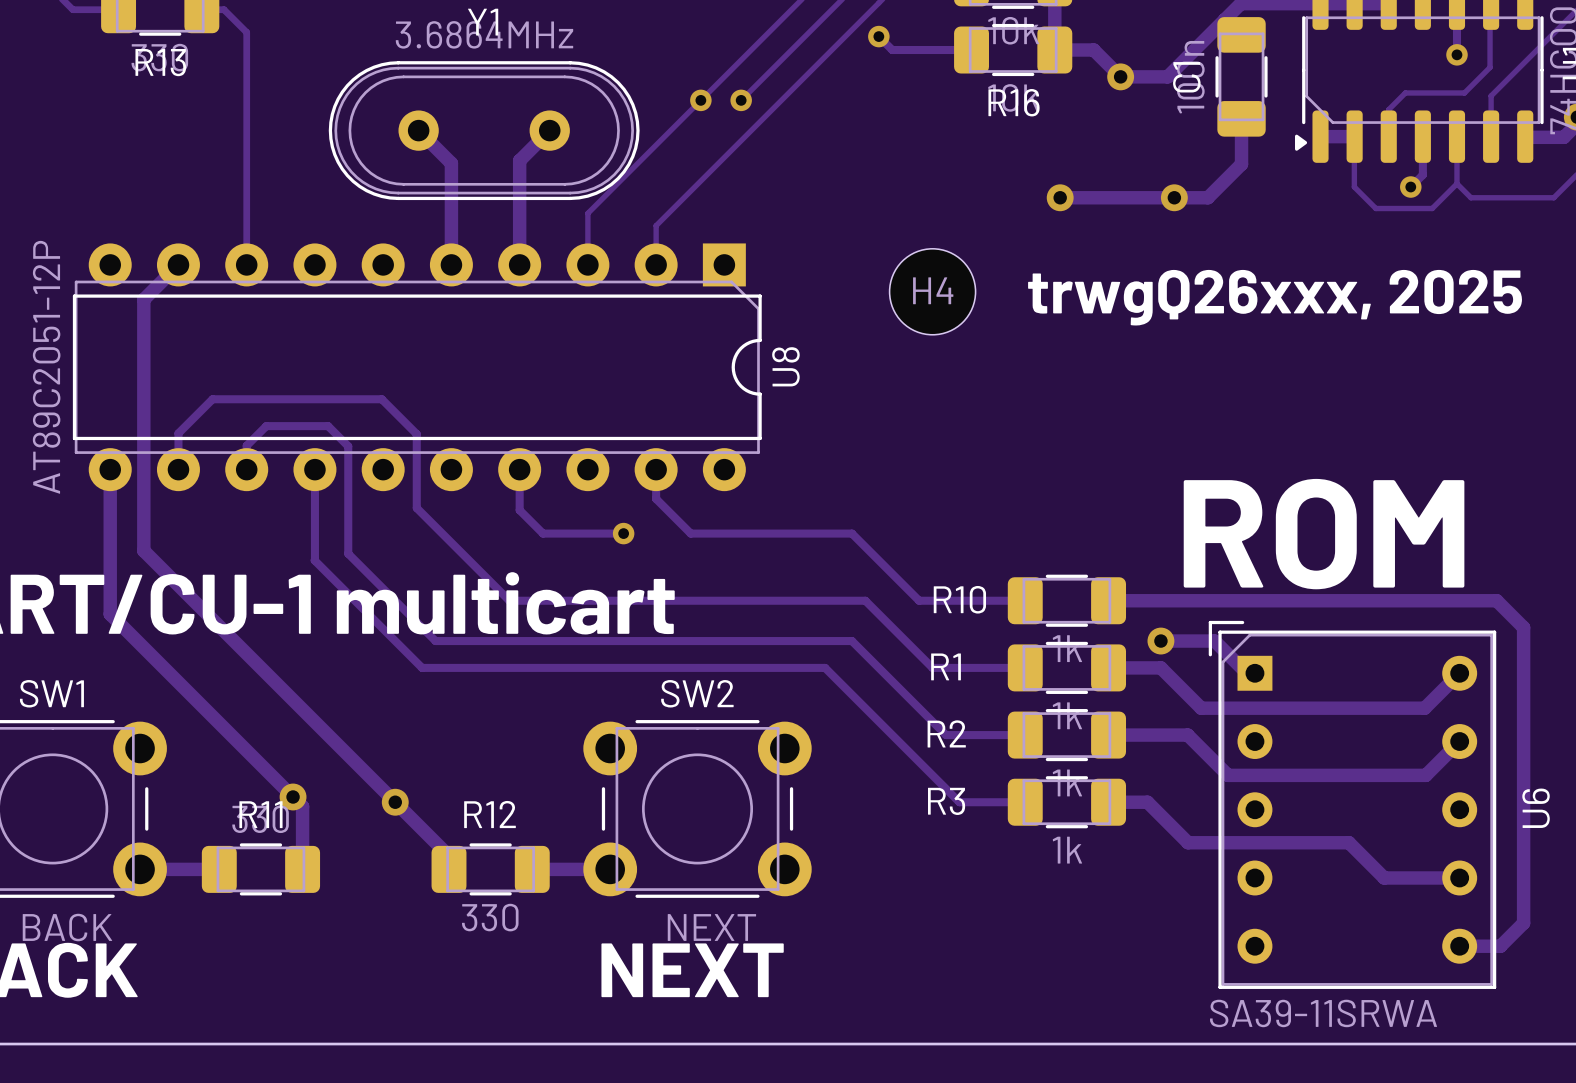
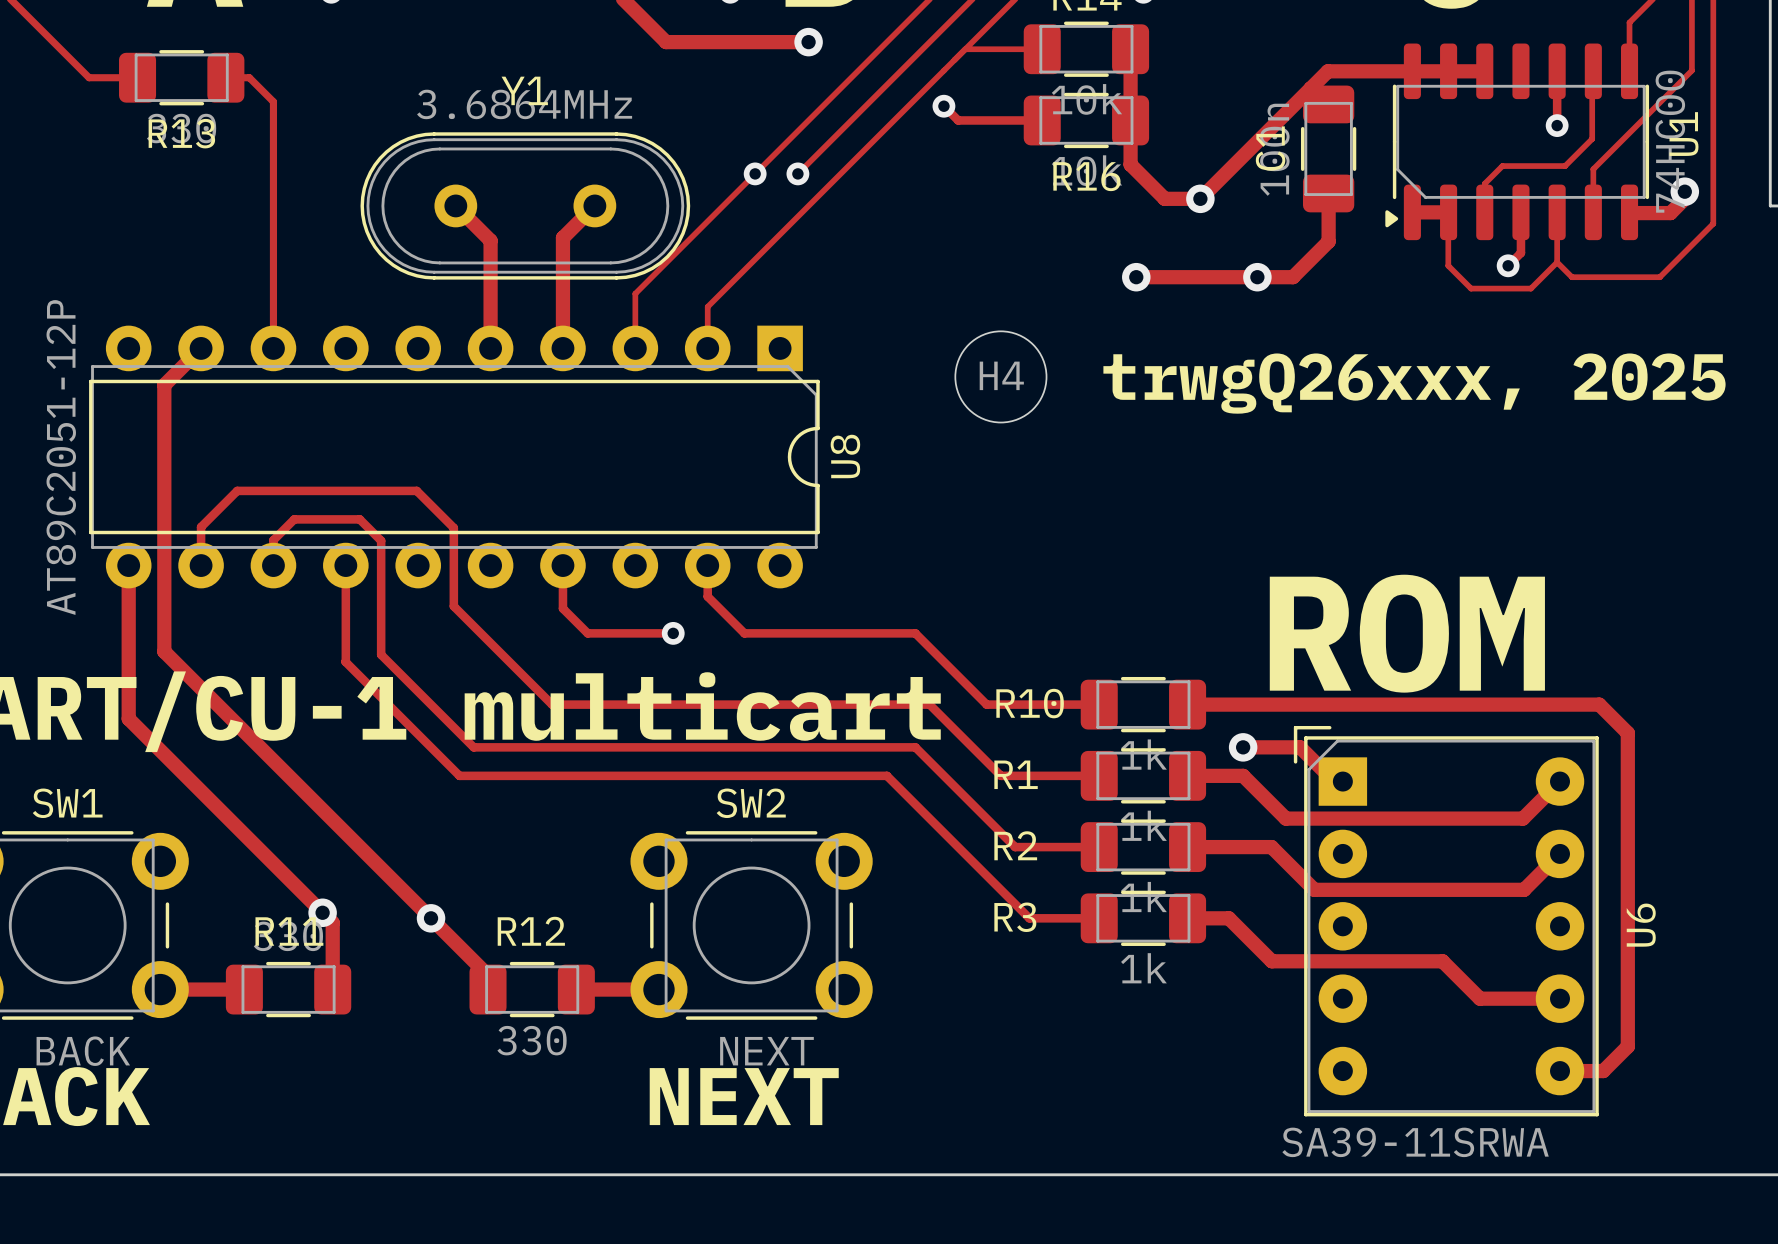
track: (1054, 50) (1093, 50) (1120, 76) (1167, 76) -> (1130, 120) (1130, 164) (1164, 198) (1200, 198) (1250, 148)
via position: (1120, 76) -> (1200, 198)
U6 footprint: [1208, 620, 1497, 989] -> [1293, 725, 1599, 1117]

